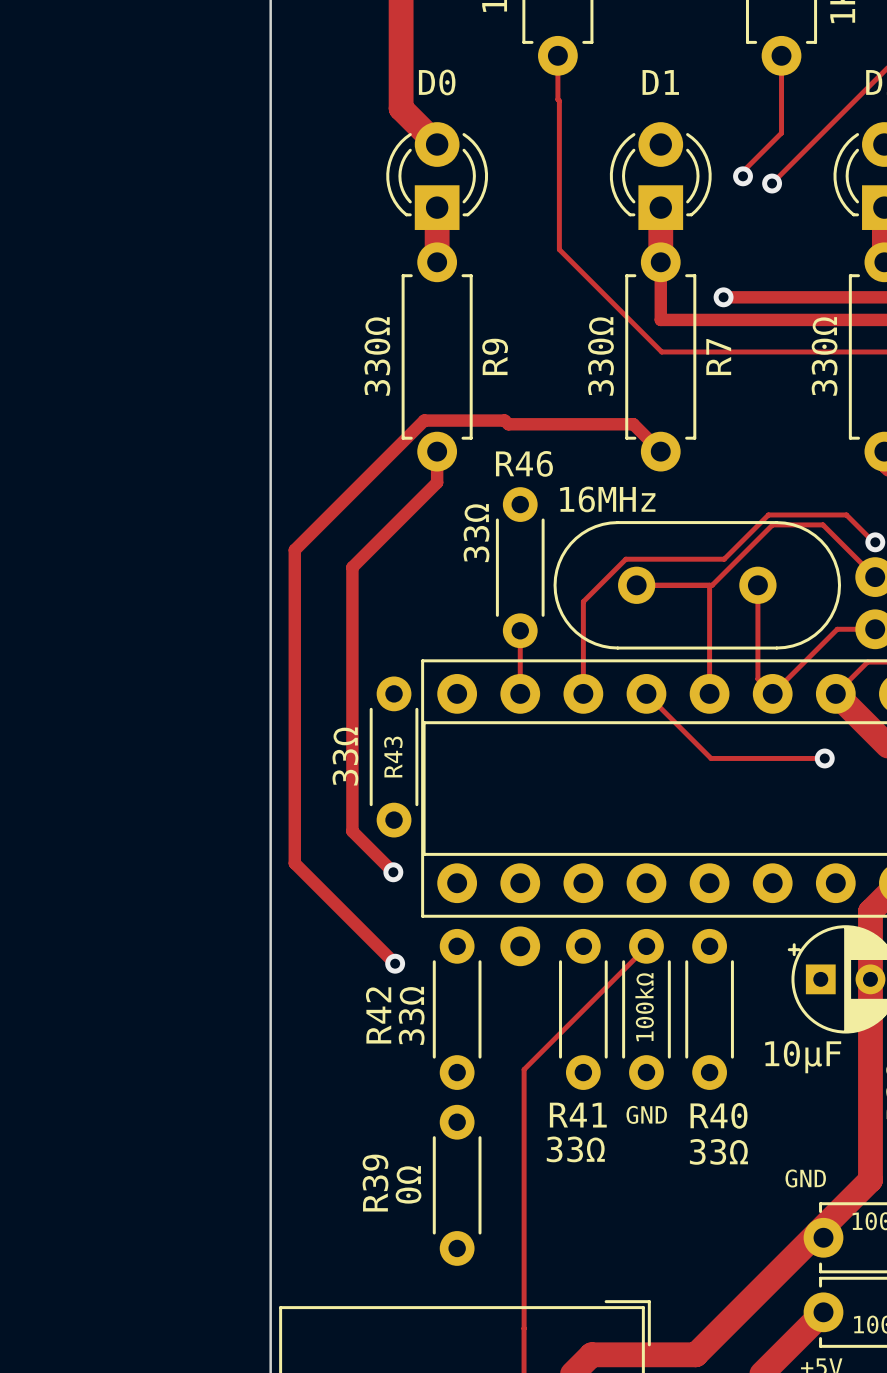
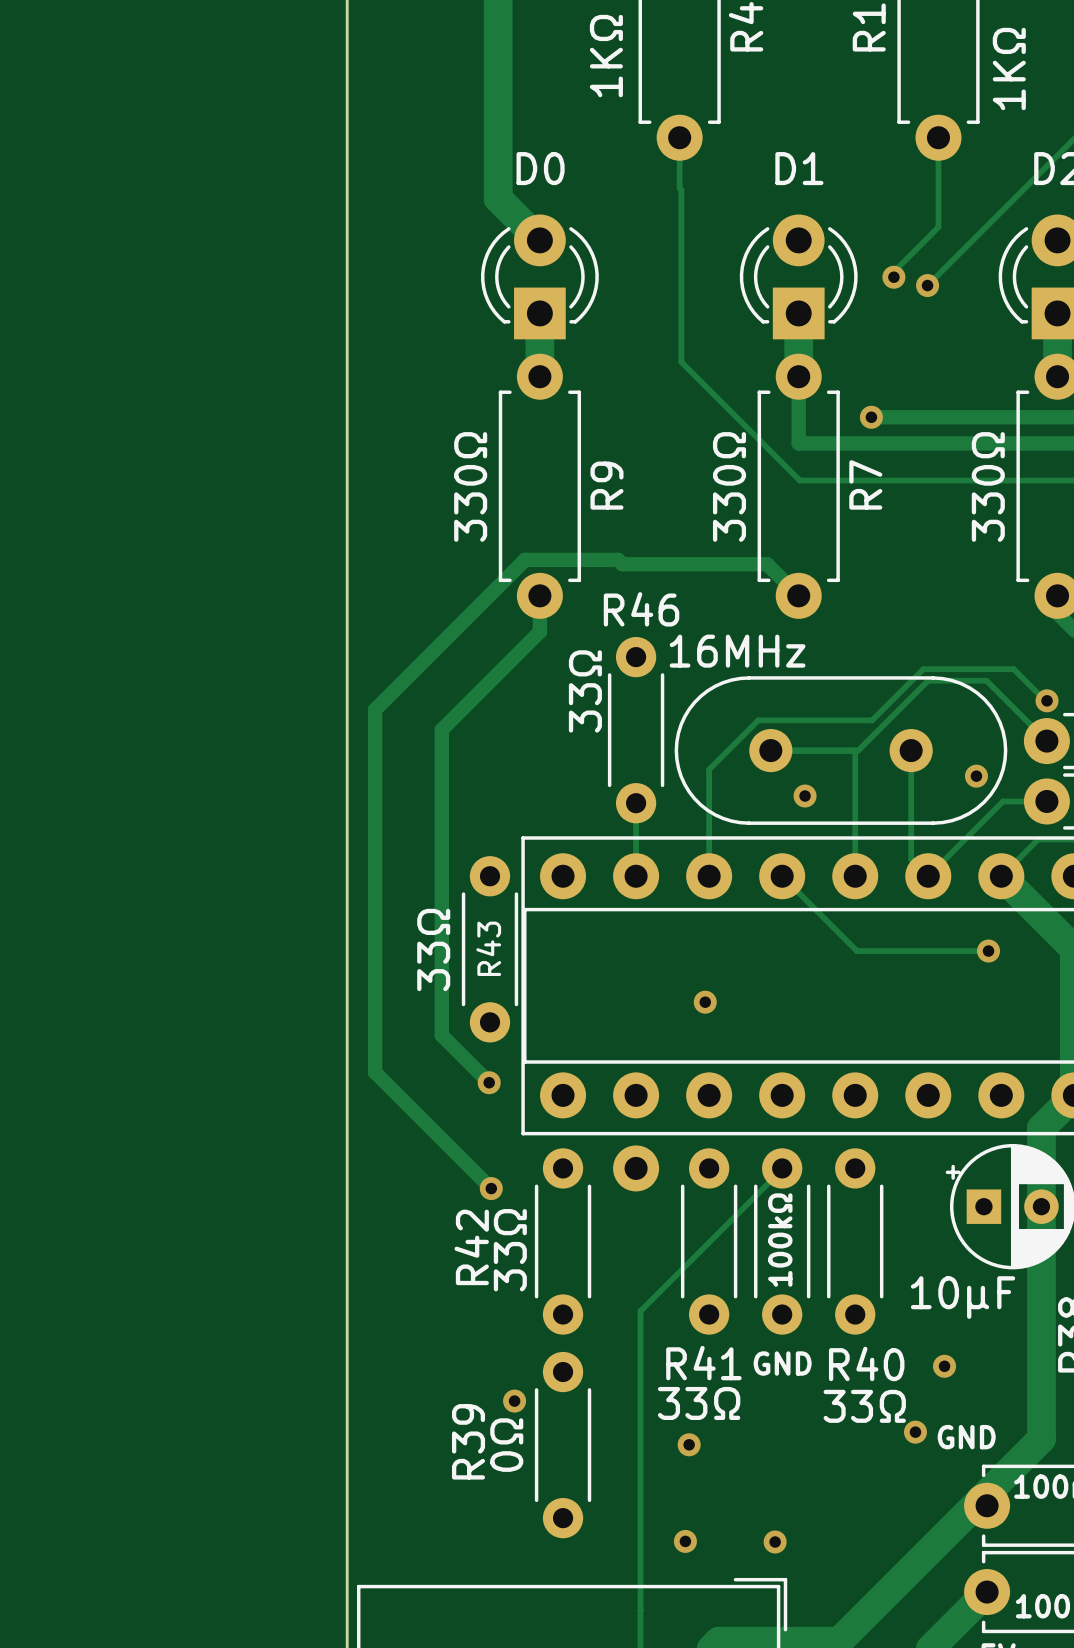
via: none -> (976, 776)
via: none -> (805, 796)
via: none -> (705, 1002)
via: none -> (944, 1366)
via: none -> (514, 1401)
via: none -> (915, 1432)
via: none -> (689, 1444)
via: none -> (685, 1541)
via: none -> (775, 1542)

